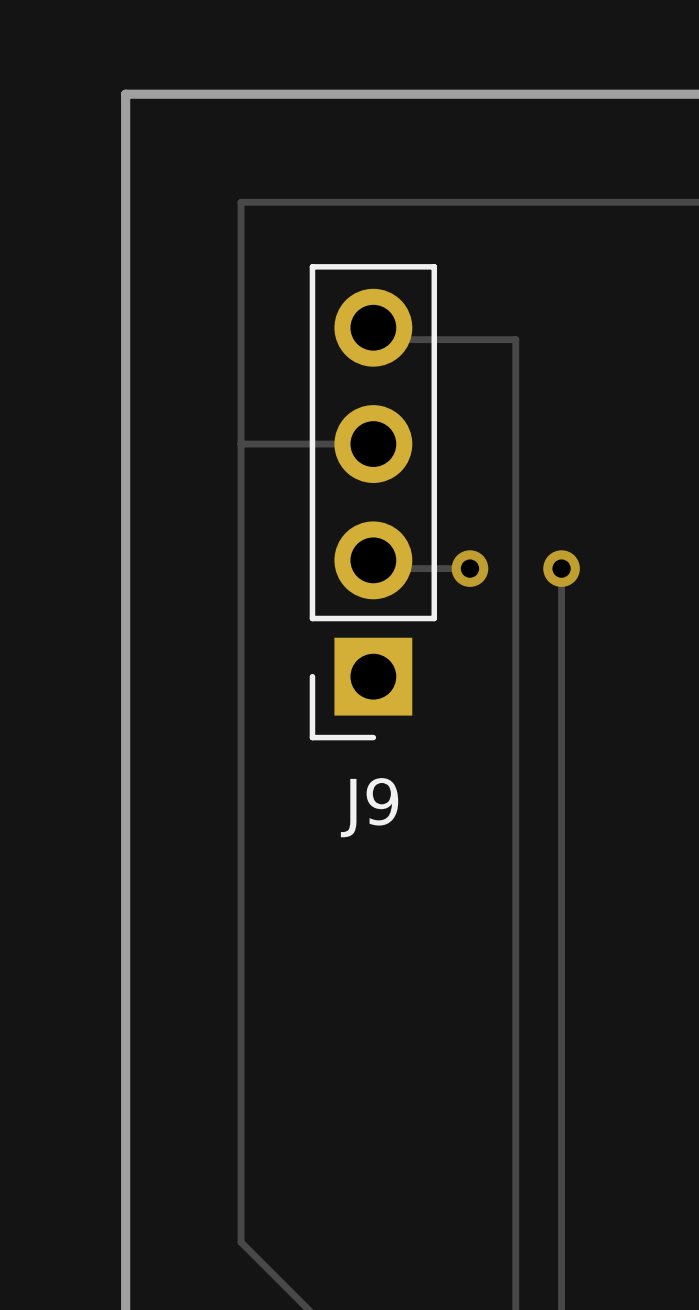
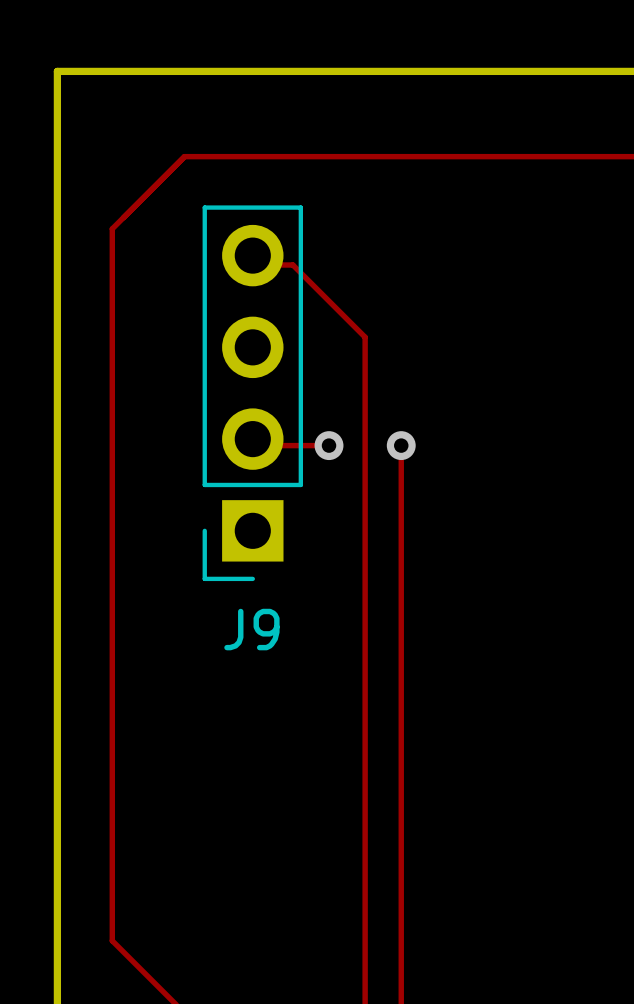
track: (286, 202) (241, 202) (241, 1242) -> (184, 156) (112, 228) (112, 940) (148, 976)
track: (424, 339) (515, 339) (515, 431) -> (292, 265) (365, 337)
track: (241, 444) (373, 444) -> none

